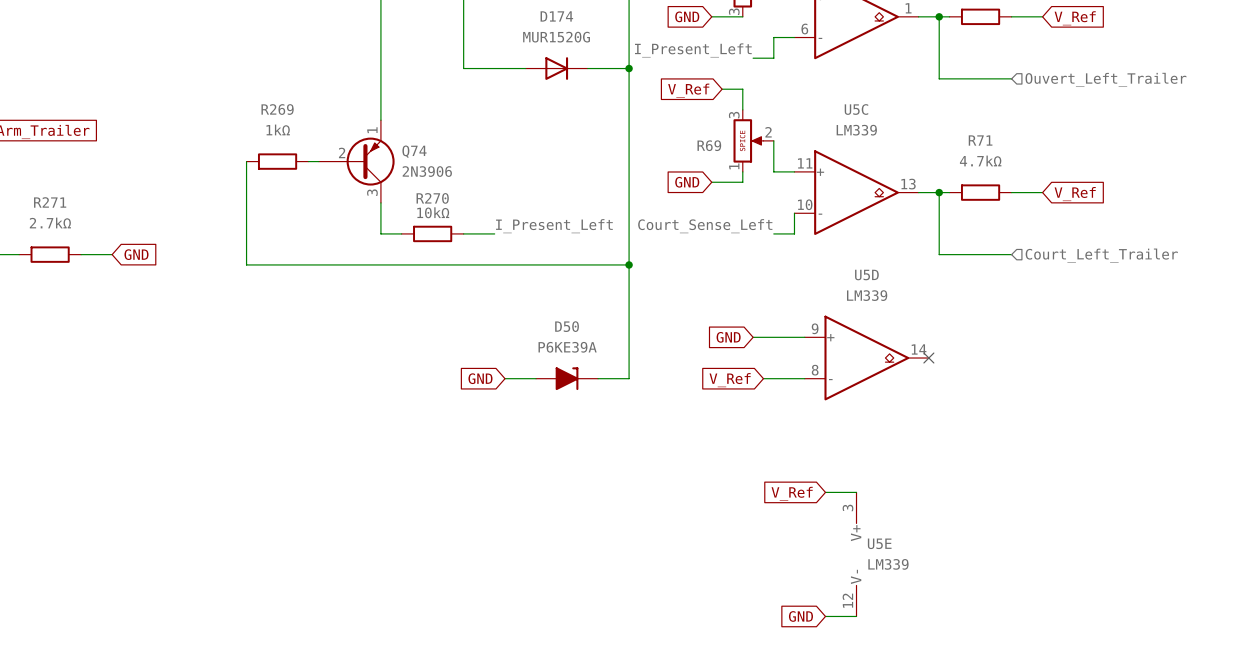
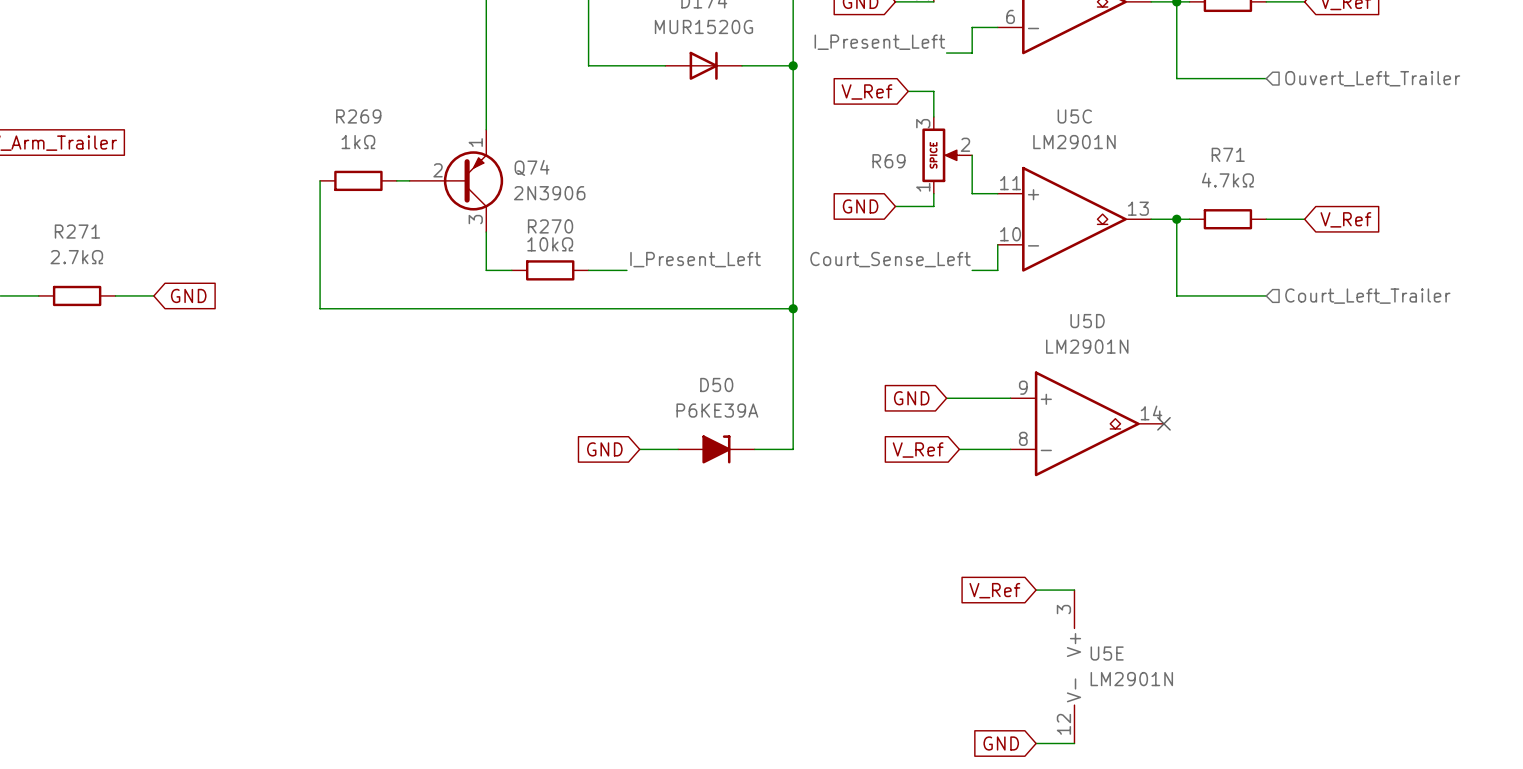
U5C value: LM339 (856, 130) -> LM2901N (1074, 142)
U5D value: LM339 (867, 295) -> LM2901N (1087, 346)
U5E value: LM339 (888, 564) -> LM2901N (1131, 679)

